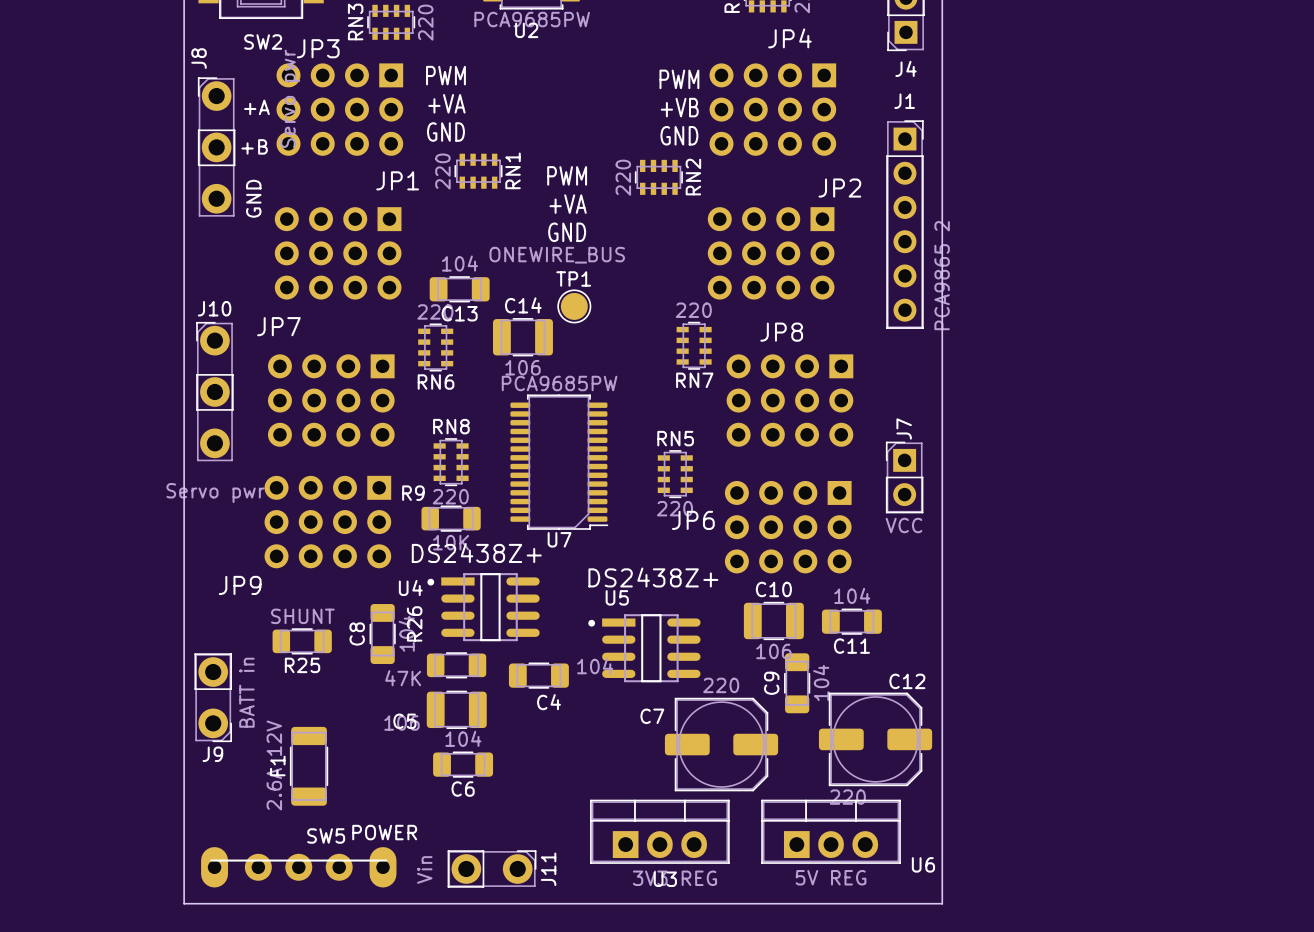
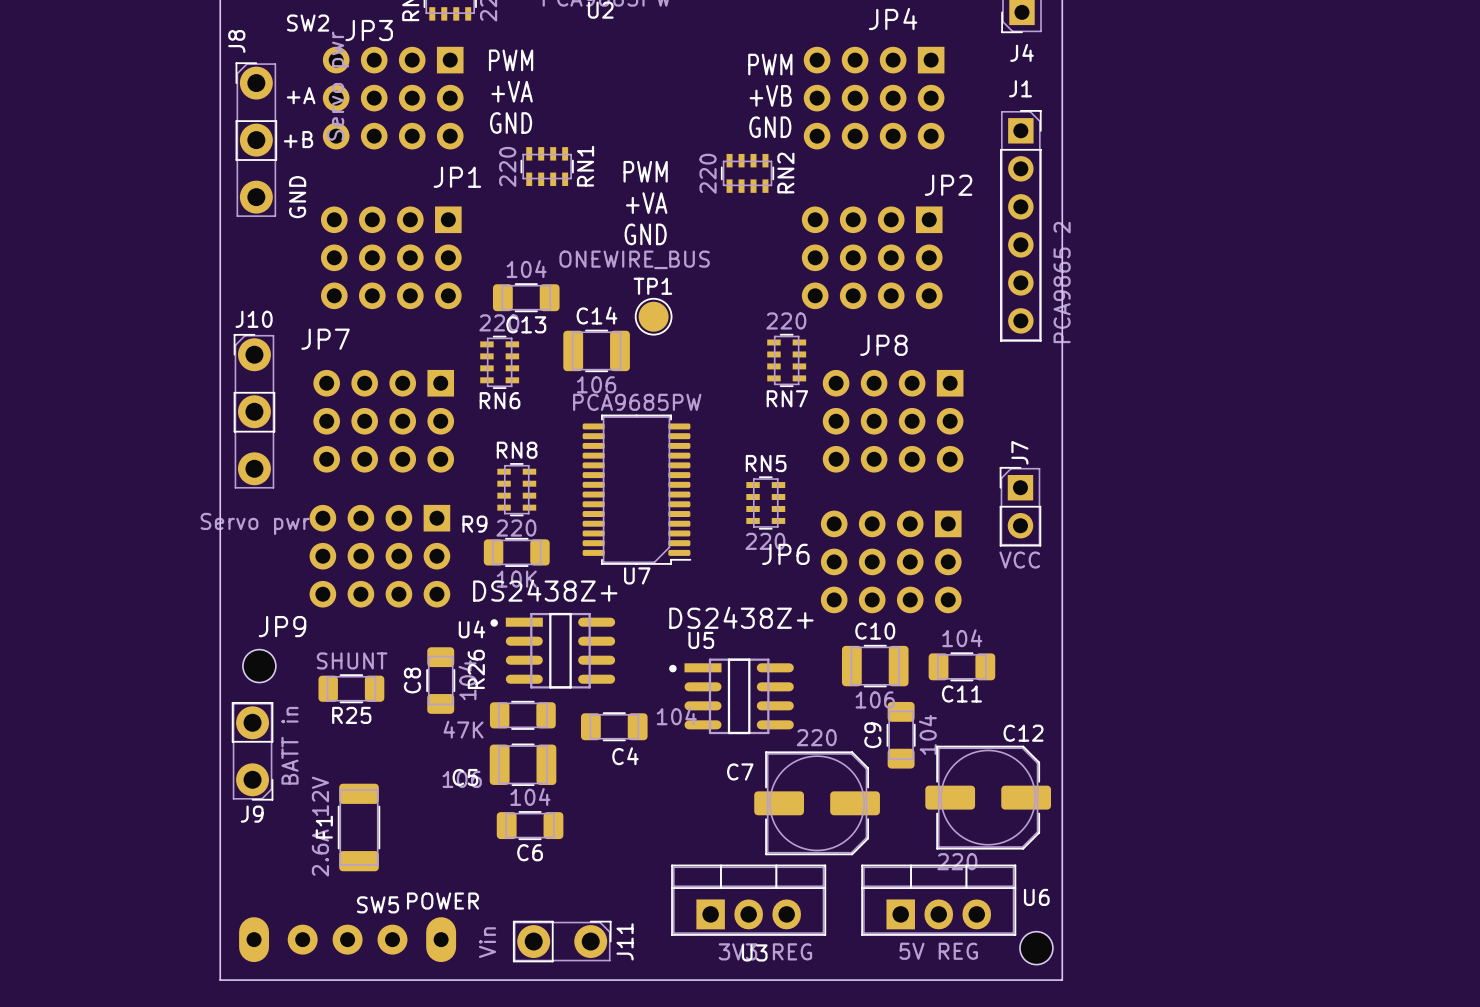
part: none -> (259, 666)
SW5 footprint: [201, 847, 397, 888] -> [239, 917, 457, 963]
U6 name position: U6 (923, 864) -> U6 (1036, 897)
part: none -> (1036, 948)

